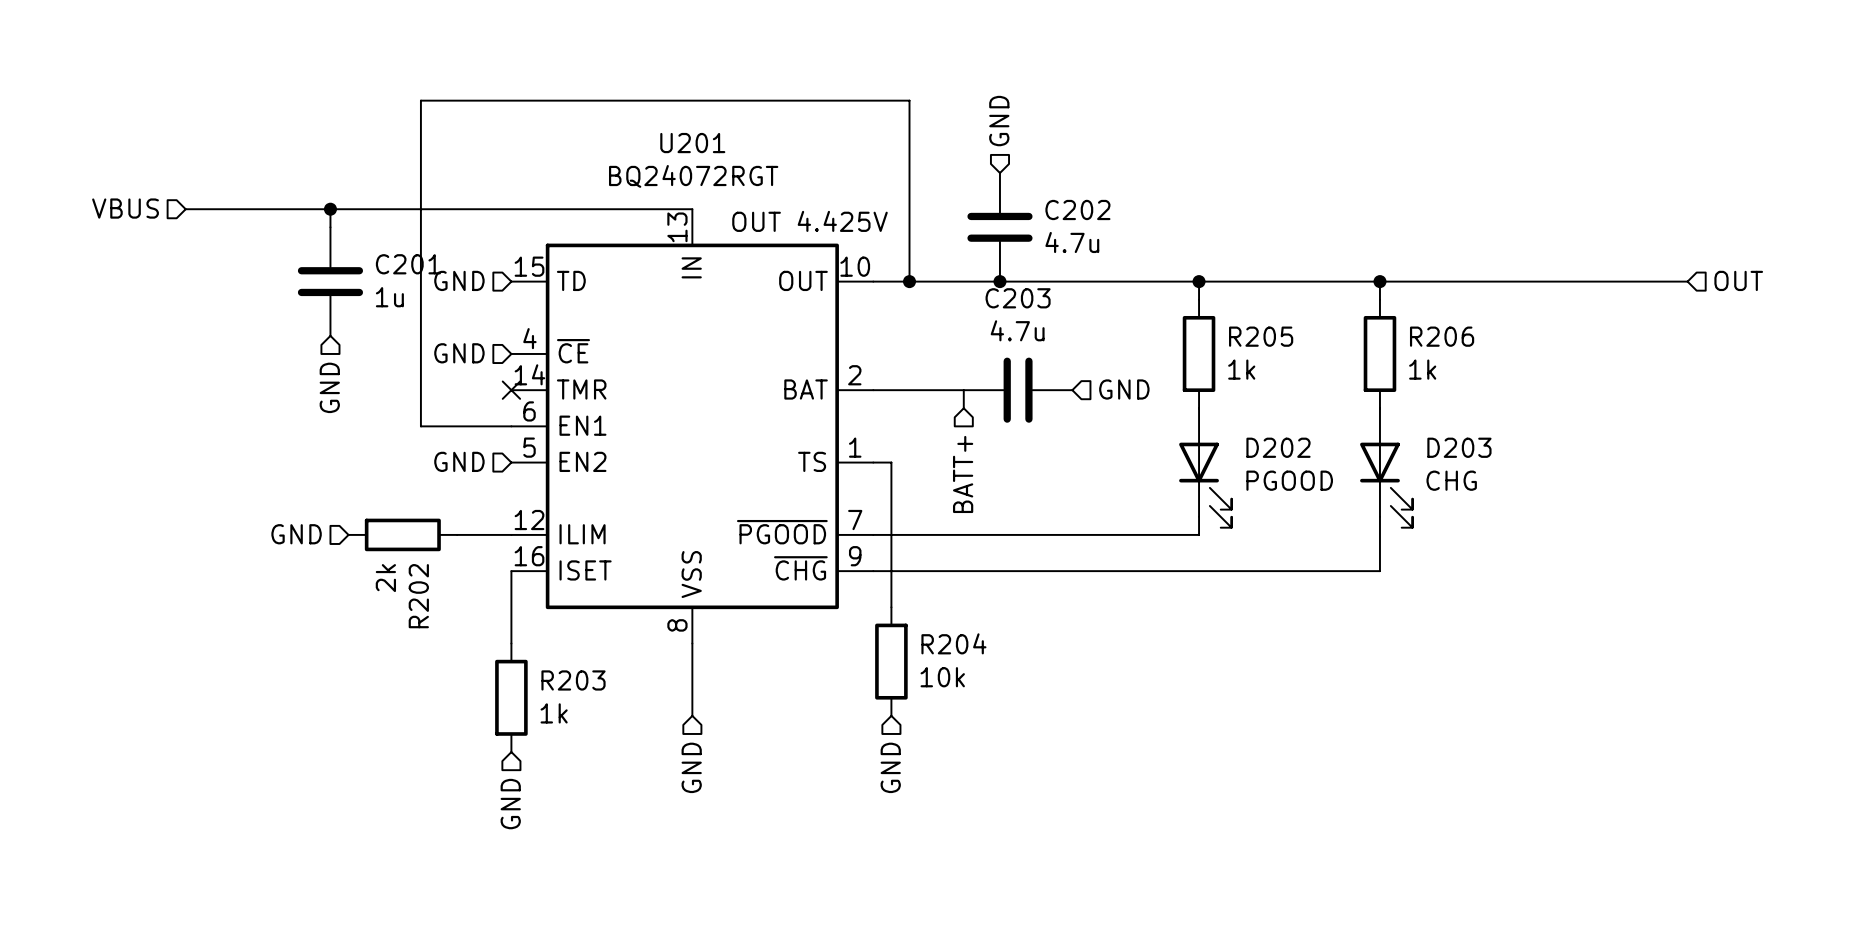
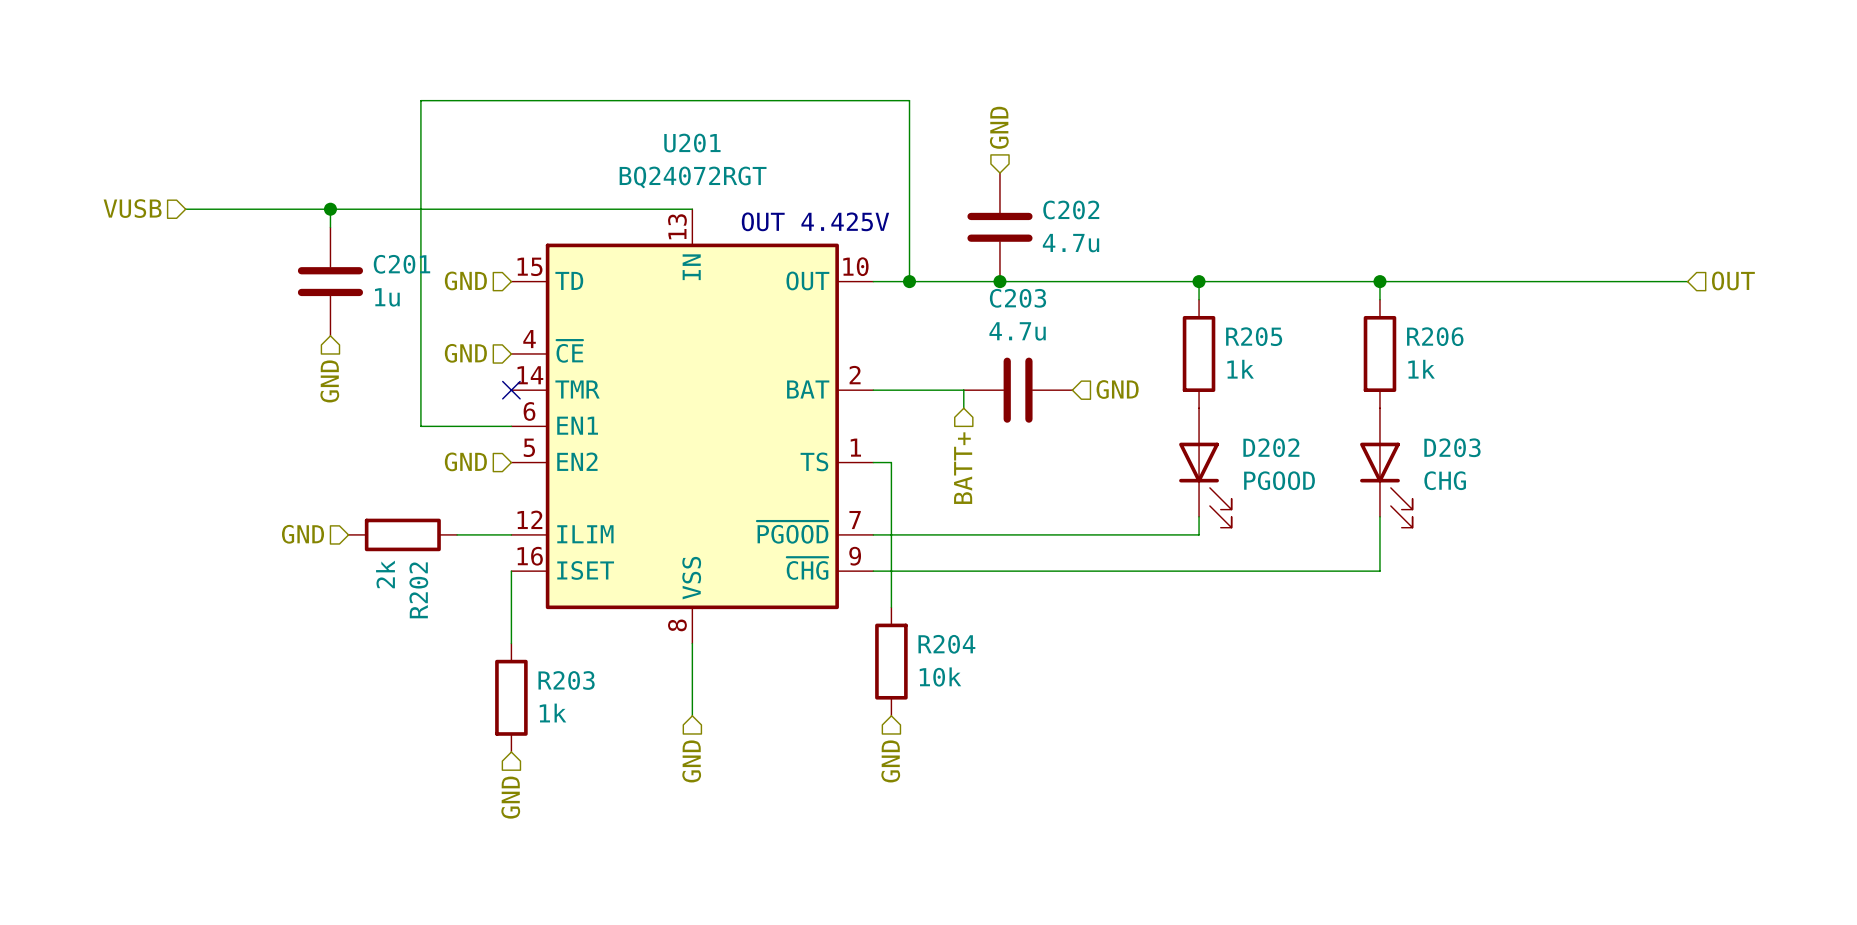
hierarchical label: VBUS (125, 208) -> VUSB (132, 208)

